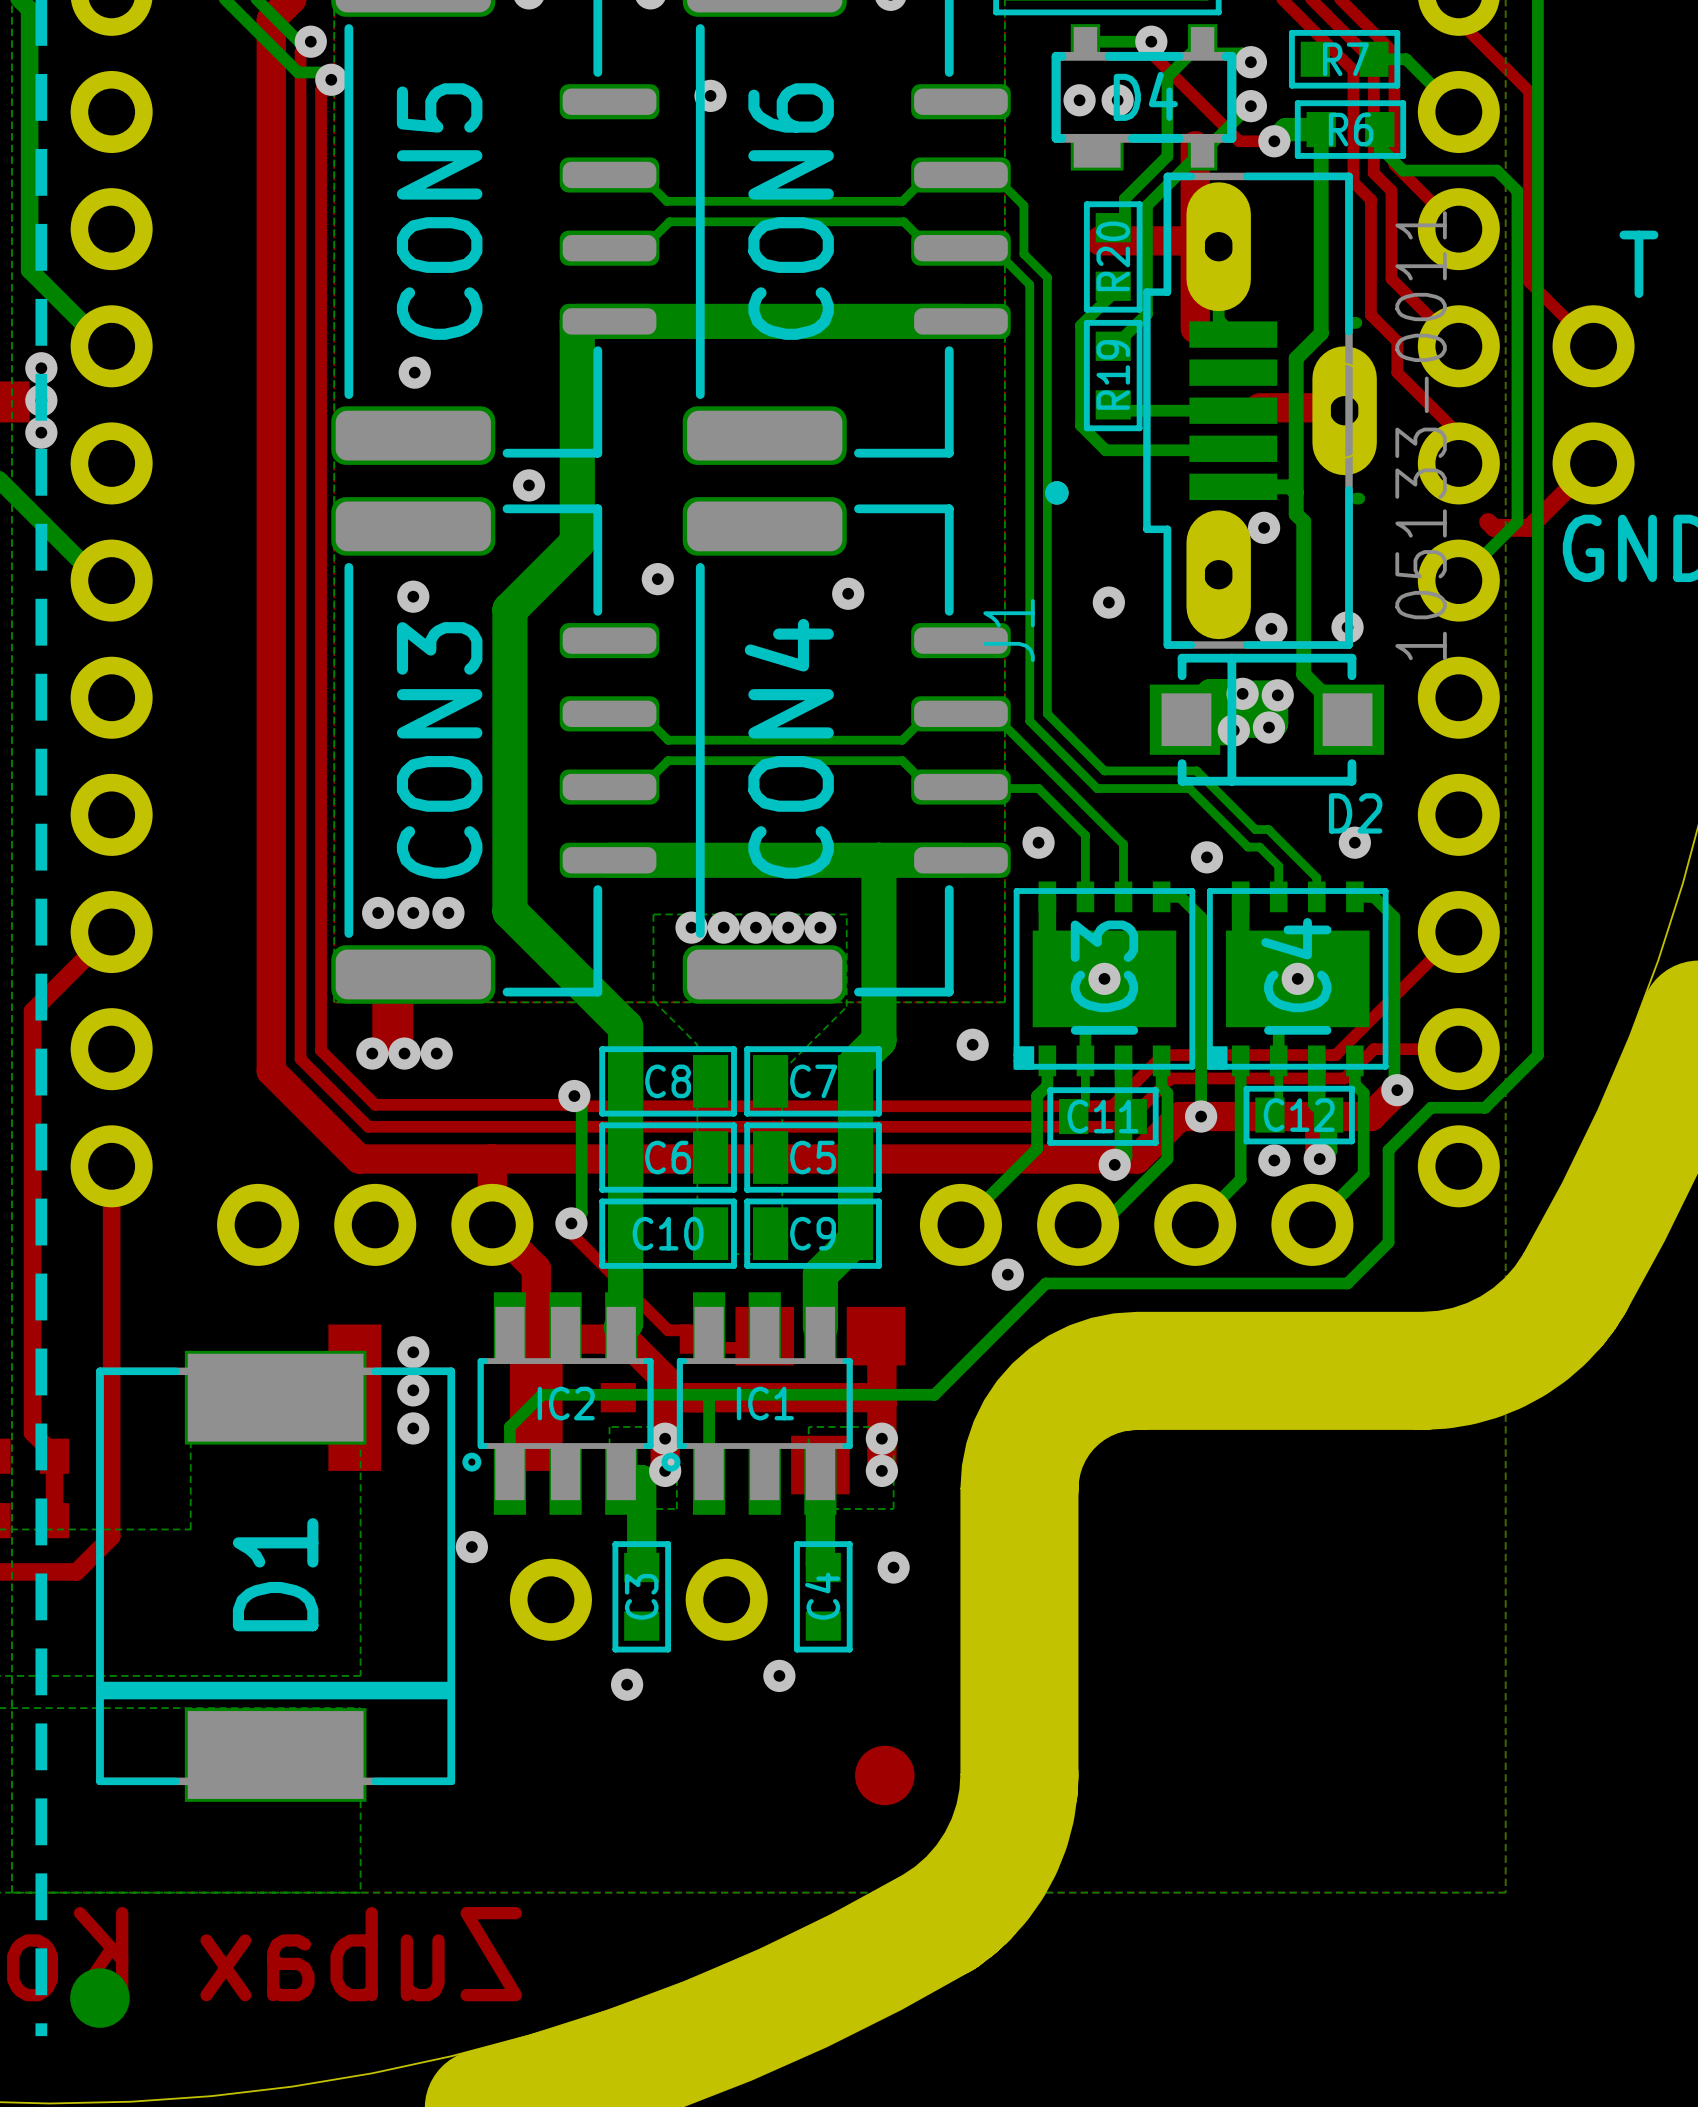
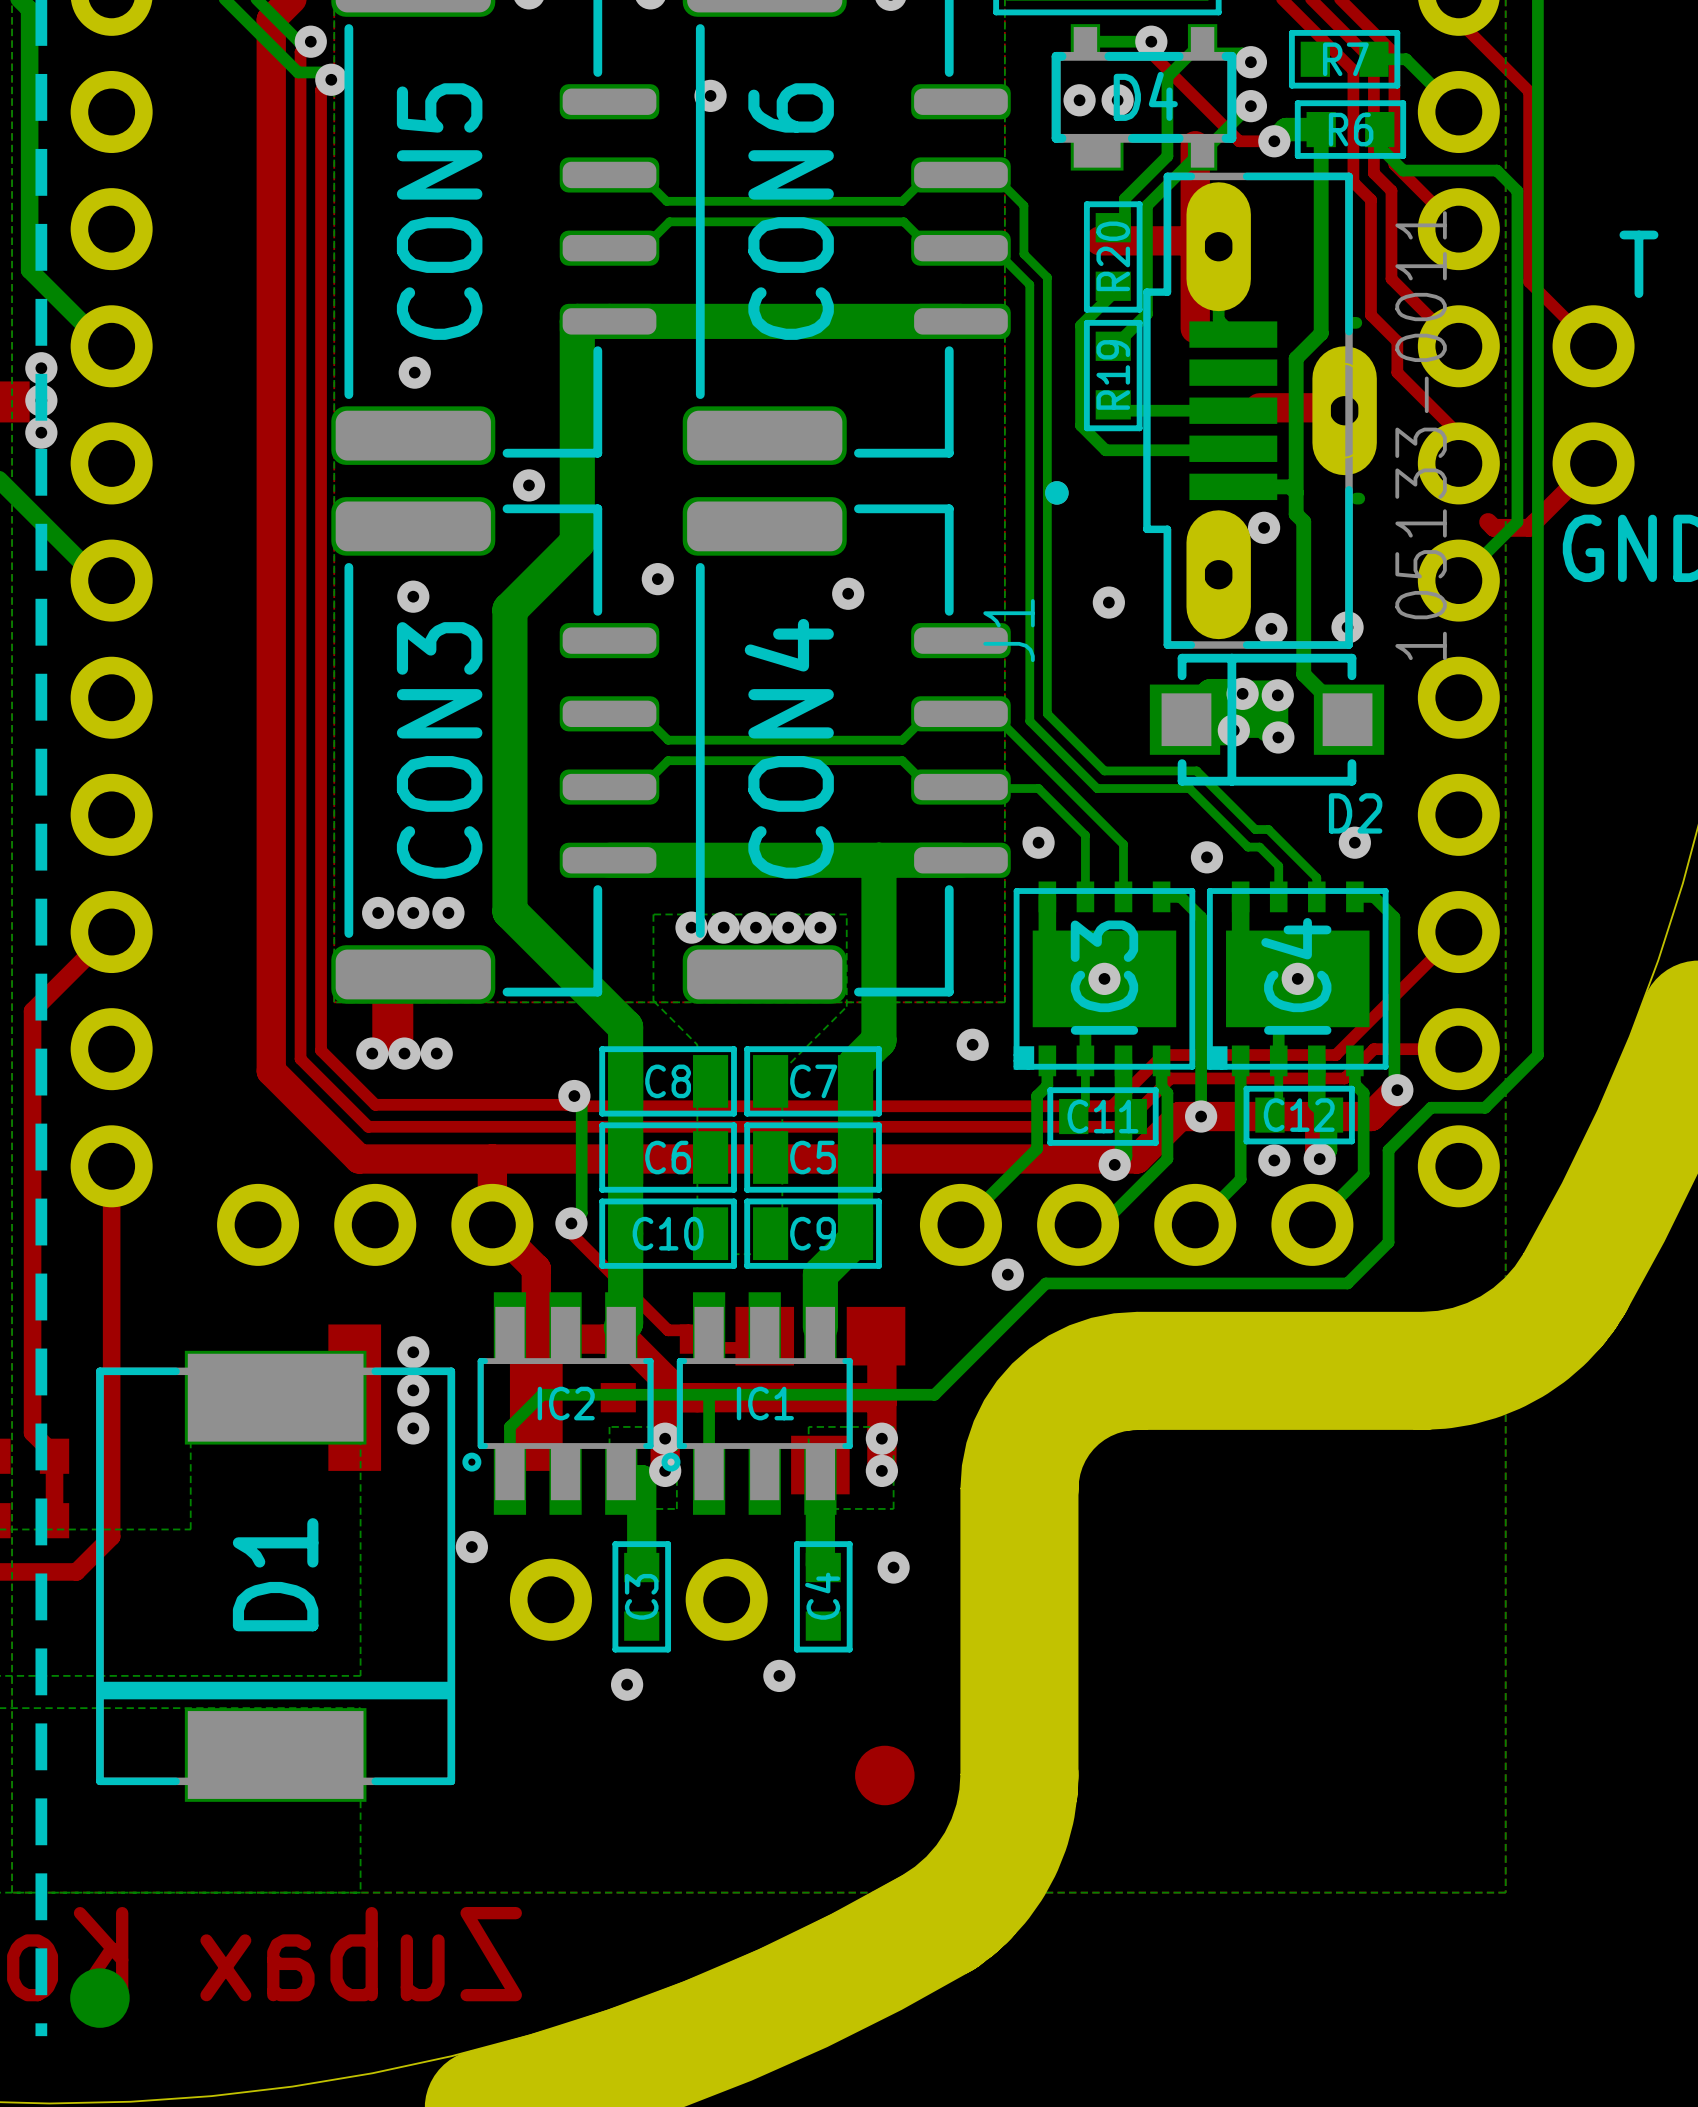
via position: (1268, 727) -> (1278, 737)

